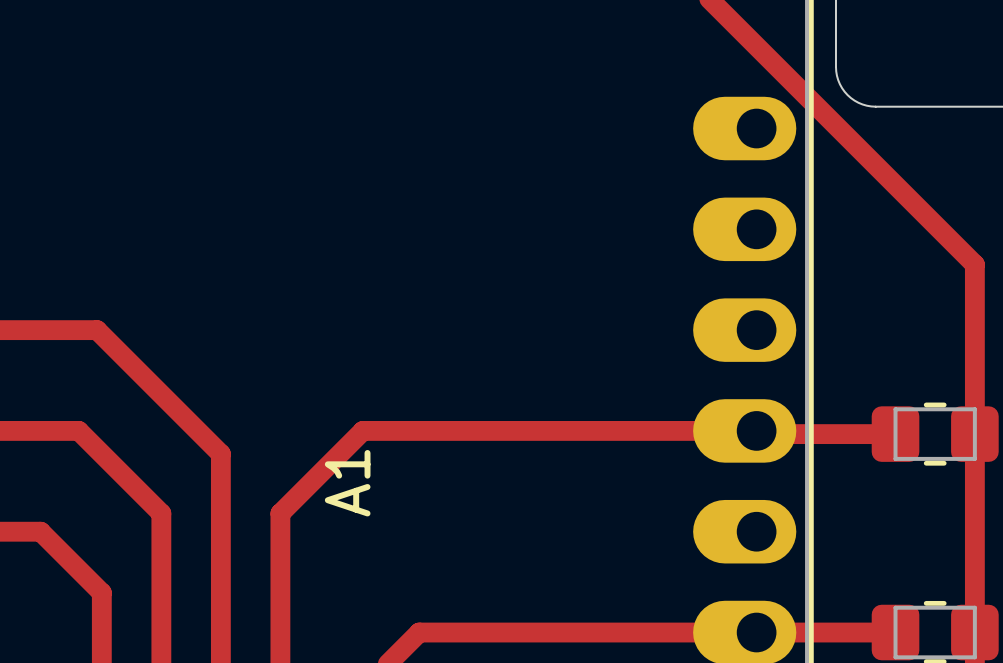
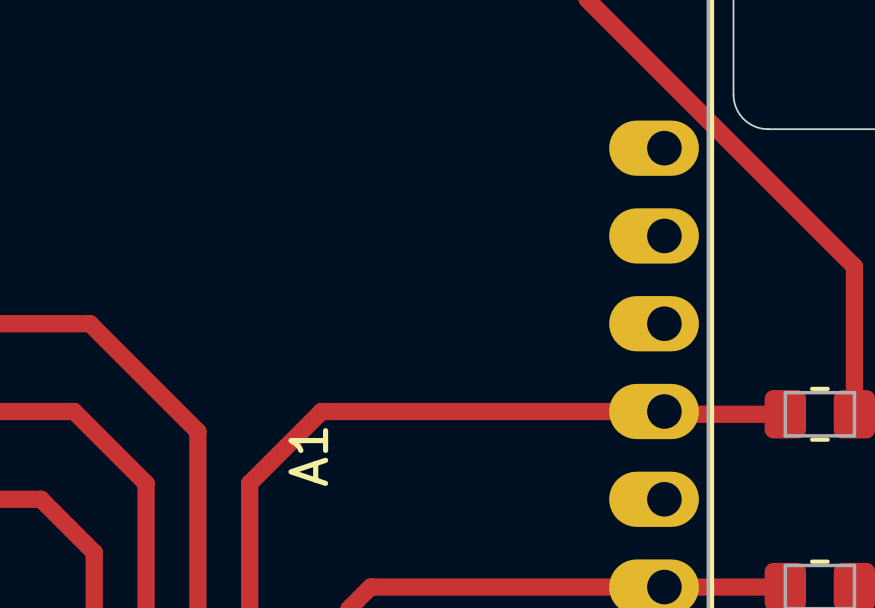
top track: (974, 434) (974, 632) -> none

